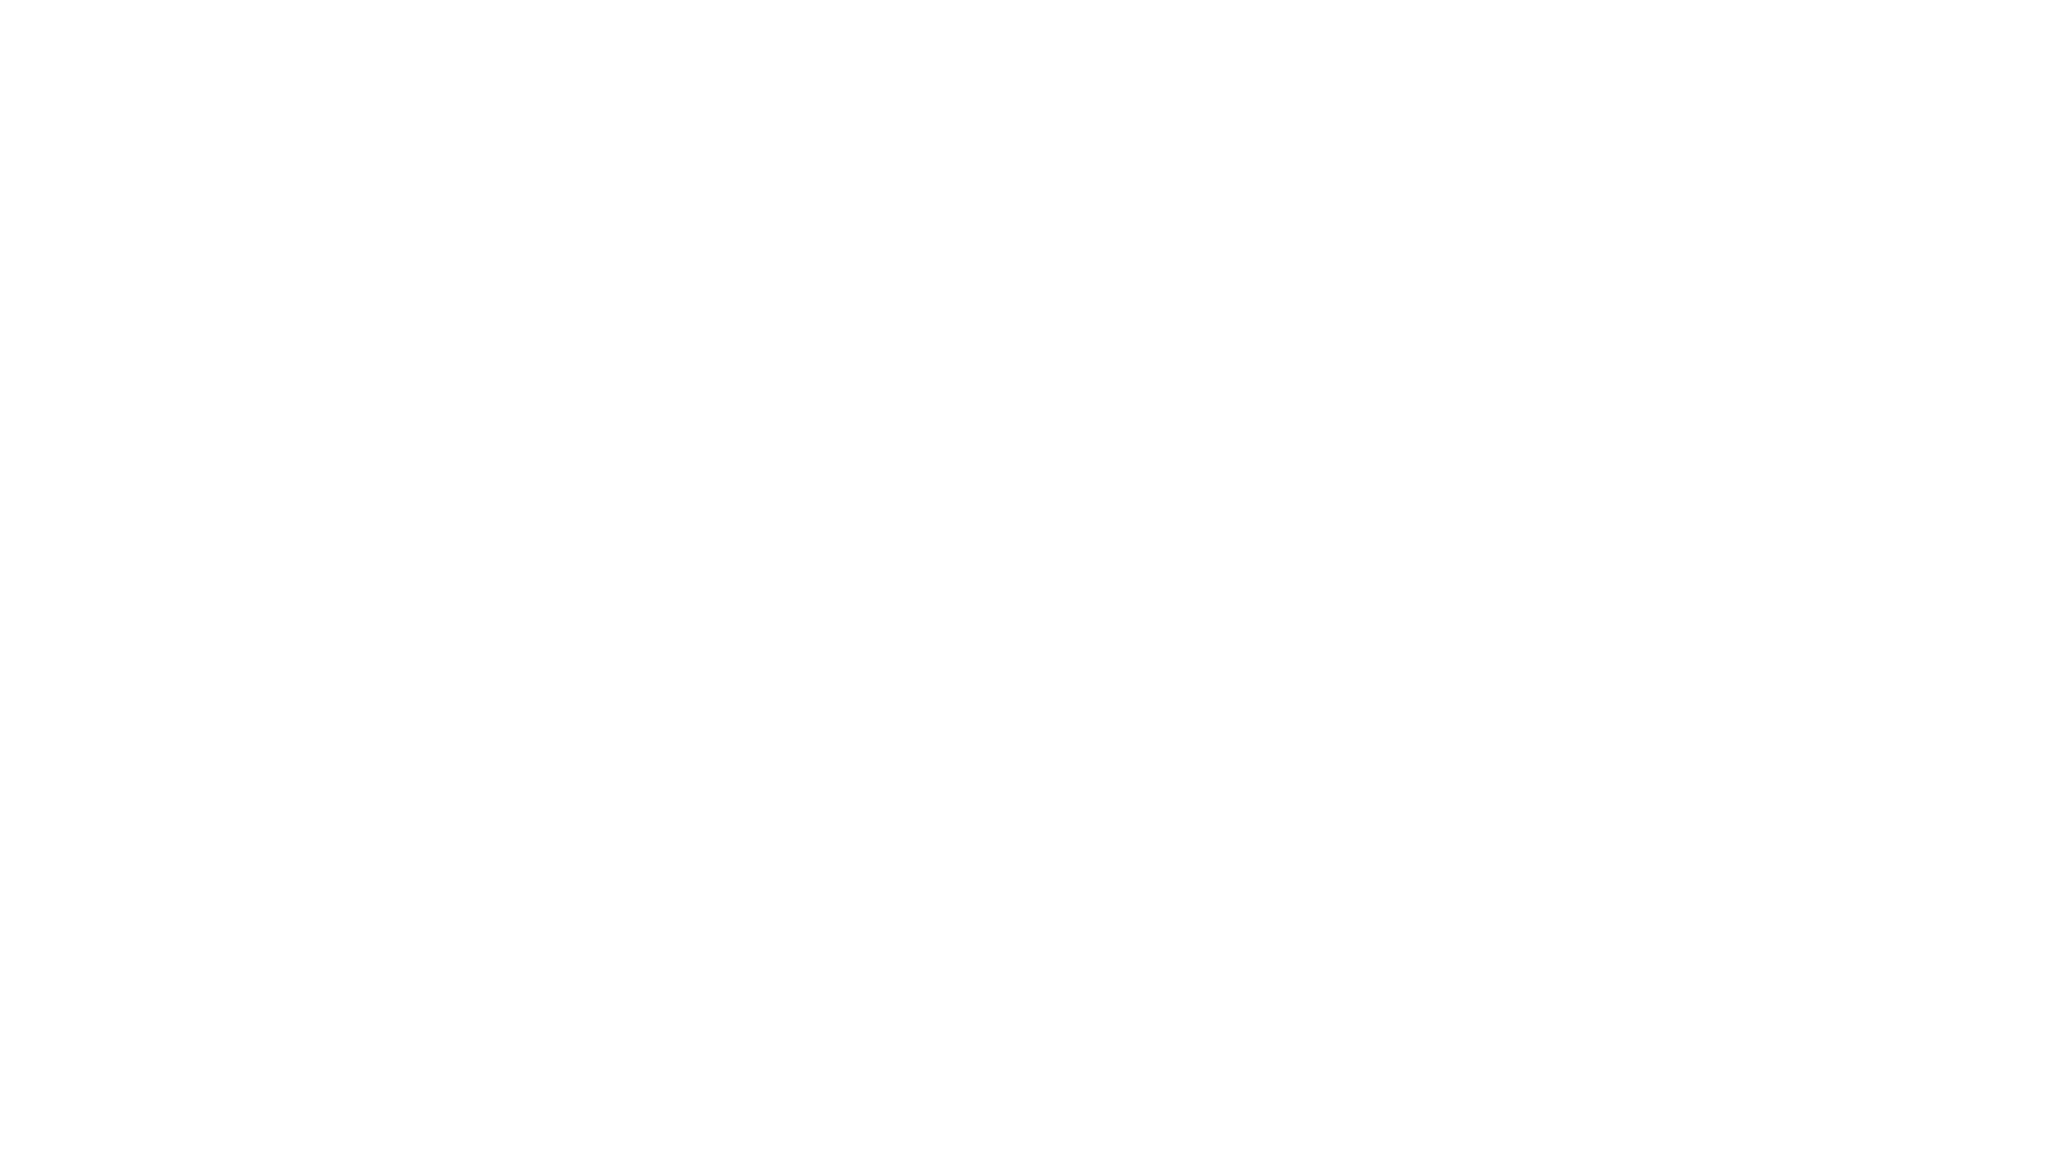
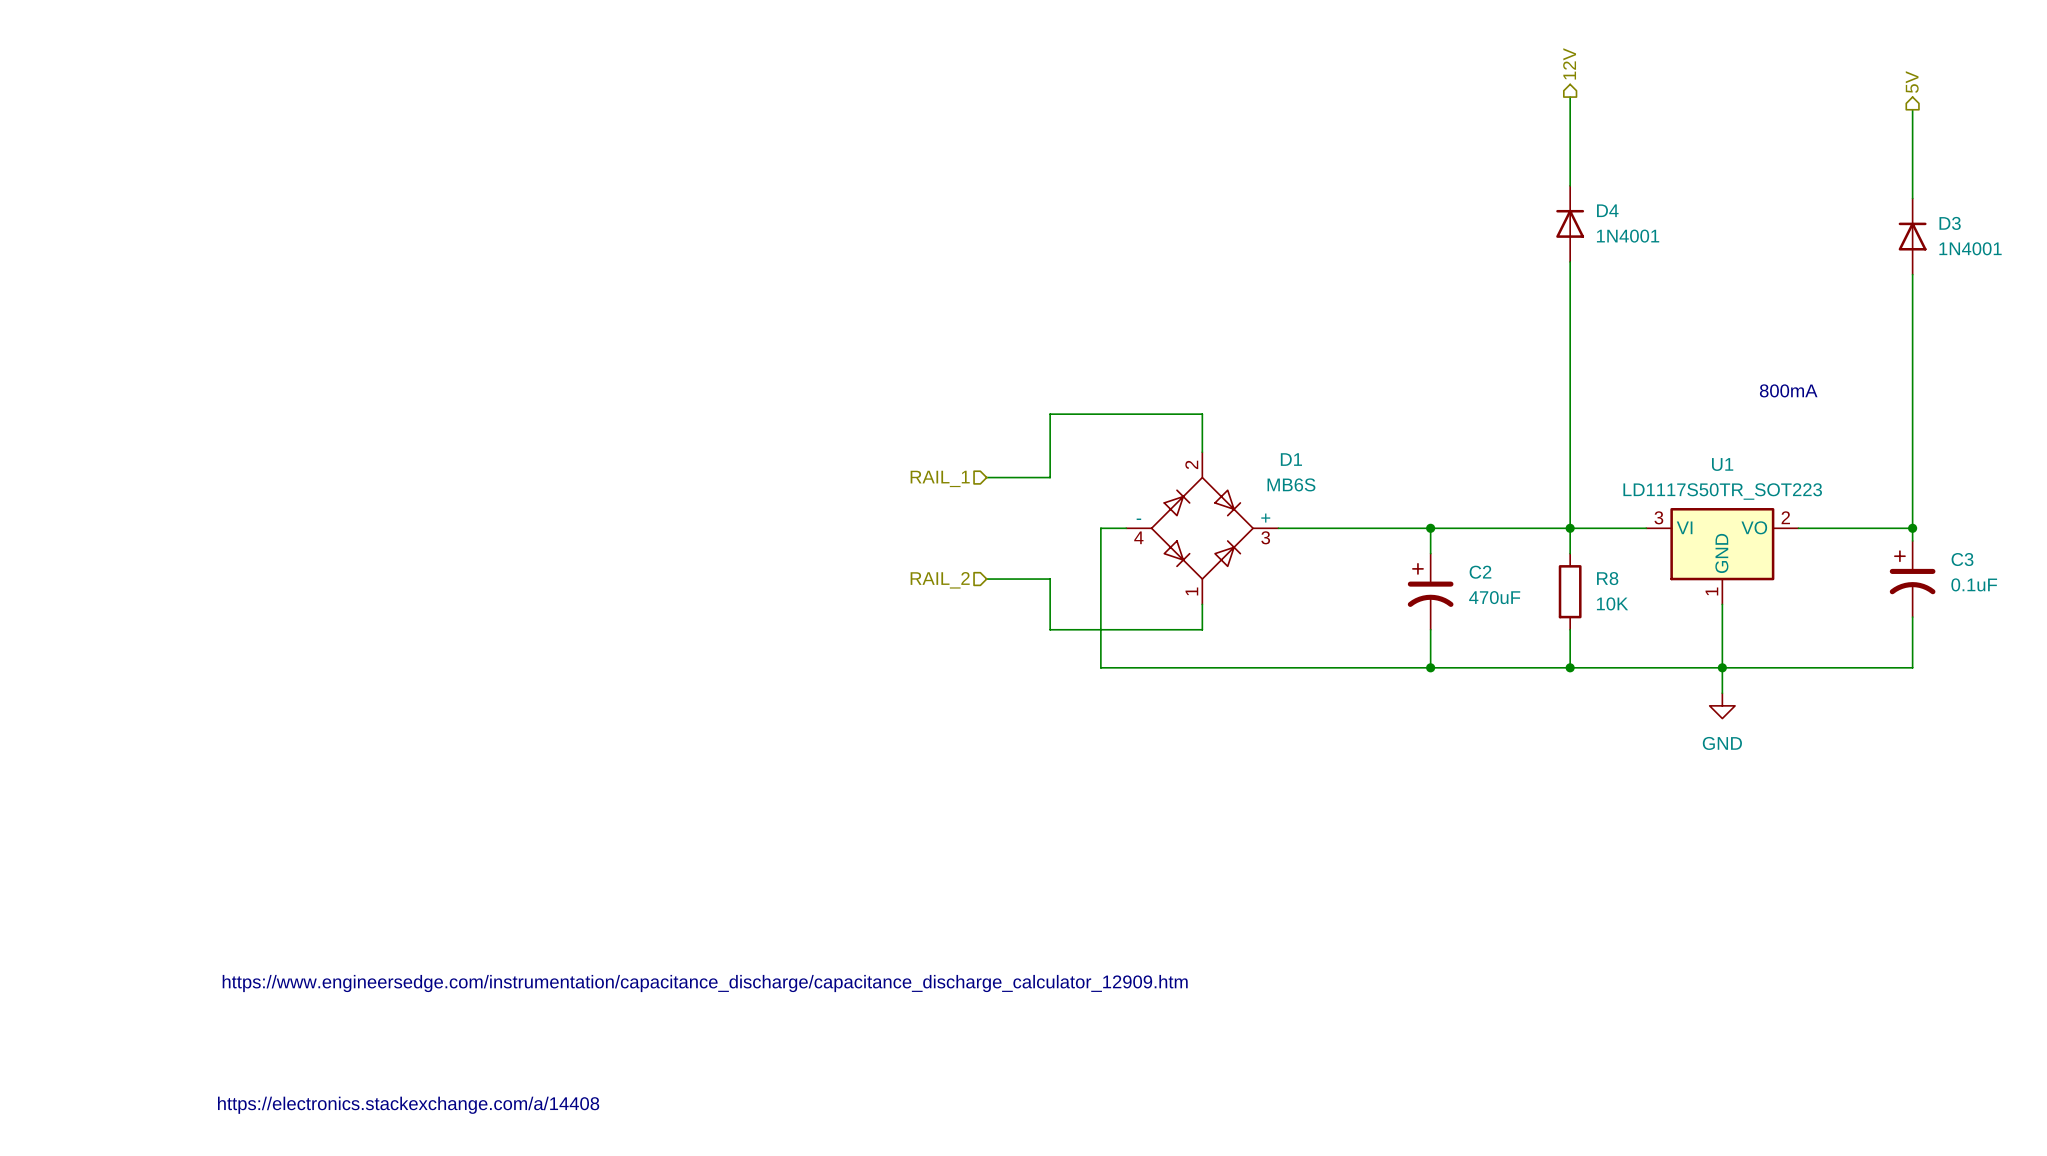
hierarchical label: none -> 12V (1569, 63)
hierarchical label: none -> 5V (1912, 82)
wire: none -> (1570, 97) (1570, 185)
wire: none -> (1912, 109) (1912, 198)
D4: none -> 1N4001 (1570, 223)
D3: none -> 1N4001 (1912, 236)
wire: none -> (1570, 261) (1570, 553)
wire: none -> (1912, 274) (1912, 540)
text: none -> 800mA (1788, 390)
wire: none -> (1202, 452) (1202, 414) (1050, 414) (1050, 477) (986, 477)
hierarchical label: none -> RAIL_1 (940, 478)
wire: none -> (1126, 528) (1100, 528) (1100, 667) (1912, 667) (1912, 617)
D1: none -> MB6S (1202, 528)
wire: none -> (1278, 528) (1646, 528)
wire: none -> (1430, 528) (1430, 553)
junction: none -> (1430, 528)
junction: none -> (1570, 528)
wire: none -> (1798, 528) (1912, 528)
junction: none -> (1912, 528)
U1: none -> LD1117S50TR_SOT223 (1722, 556)
wire: none -> (986, 579) (1050, 579) (1050, 629) (1202, 629) (1202, 604)
C3: none -> 0.1uF (1912, 579)
hierarchical label: none -> RAIL_2 (940, 580)
C2: none -> 470uF (1430, 591)
R8: none -> 10K (1570, 591)
wire: none -> (1722, 604) (1722, 693)
wire: none -> (1430, 629) (1430, 667)
wire: none -> (1570, 629) (1570, 667)
junction: none -> (1430, 667)
junction: none -> (1570, 667)
junction: none -> (1722, 667)
power symbol: none -> GND (1722, 705)
text: none -> https://www.engineersedge.com/instrumentation/capacitance_discharge/capacitance_discharge_calculator_12909.htm (705, 983)
text: none -> https://electronics.stackexchange.com/a/14408 (408, 1105)

